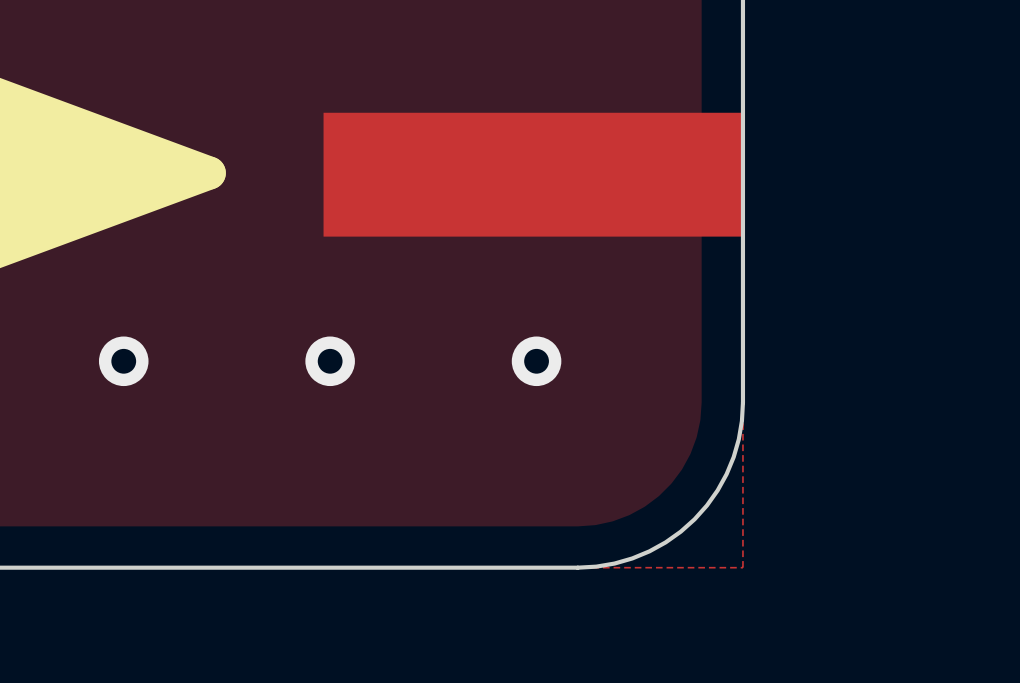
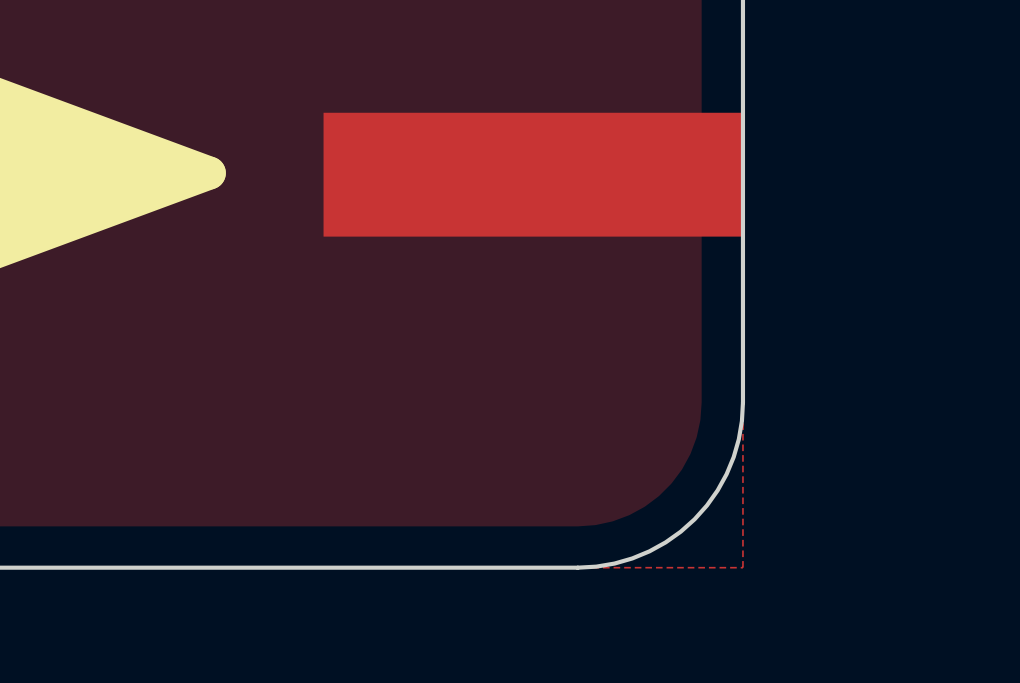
via: (123, 361) -> none
via: (330, 361) -> none
via: (536, 361) -> none

